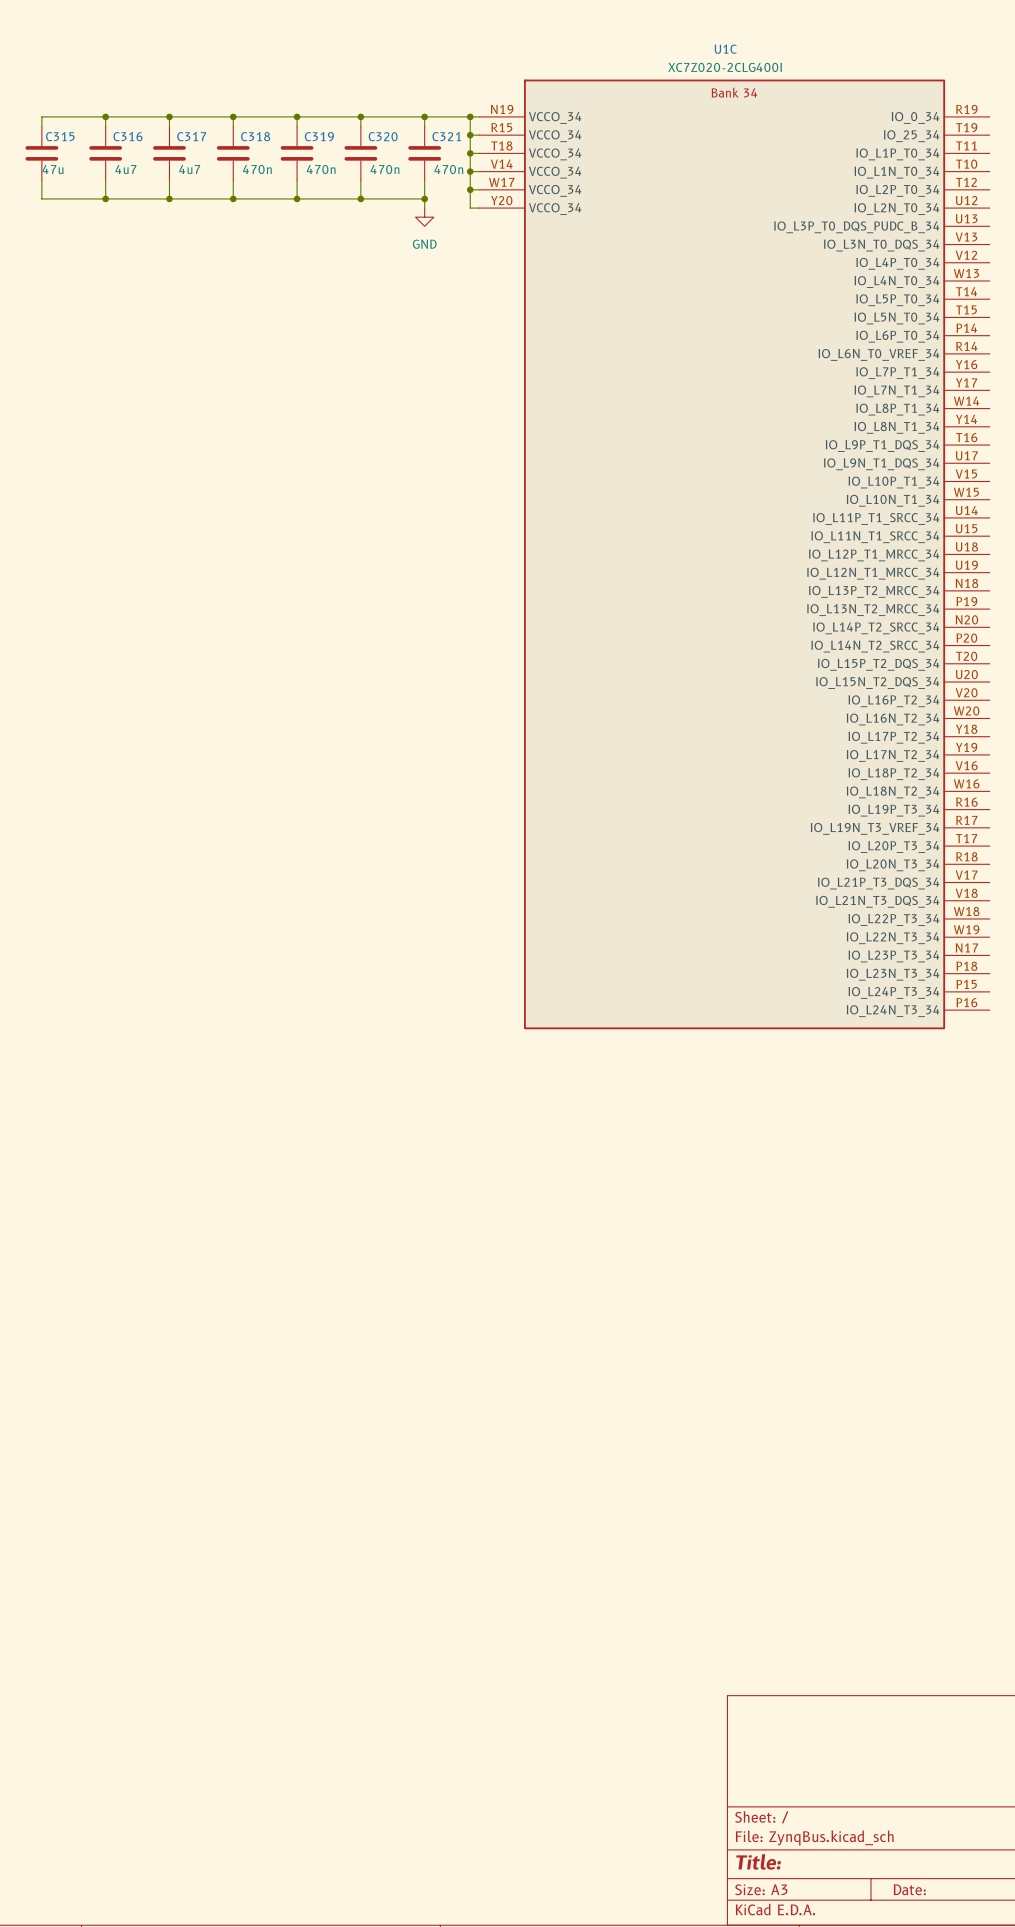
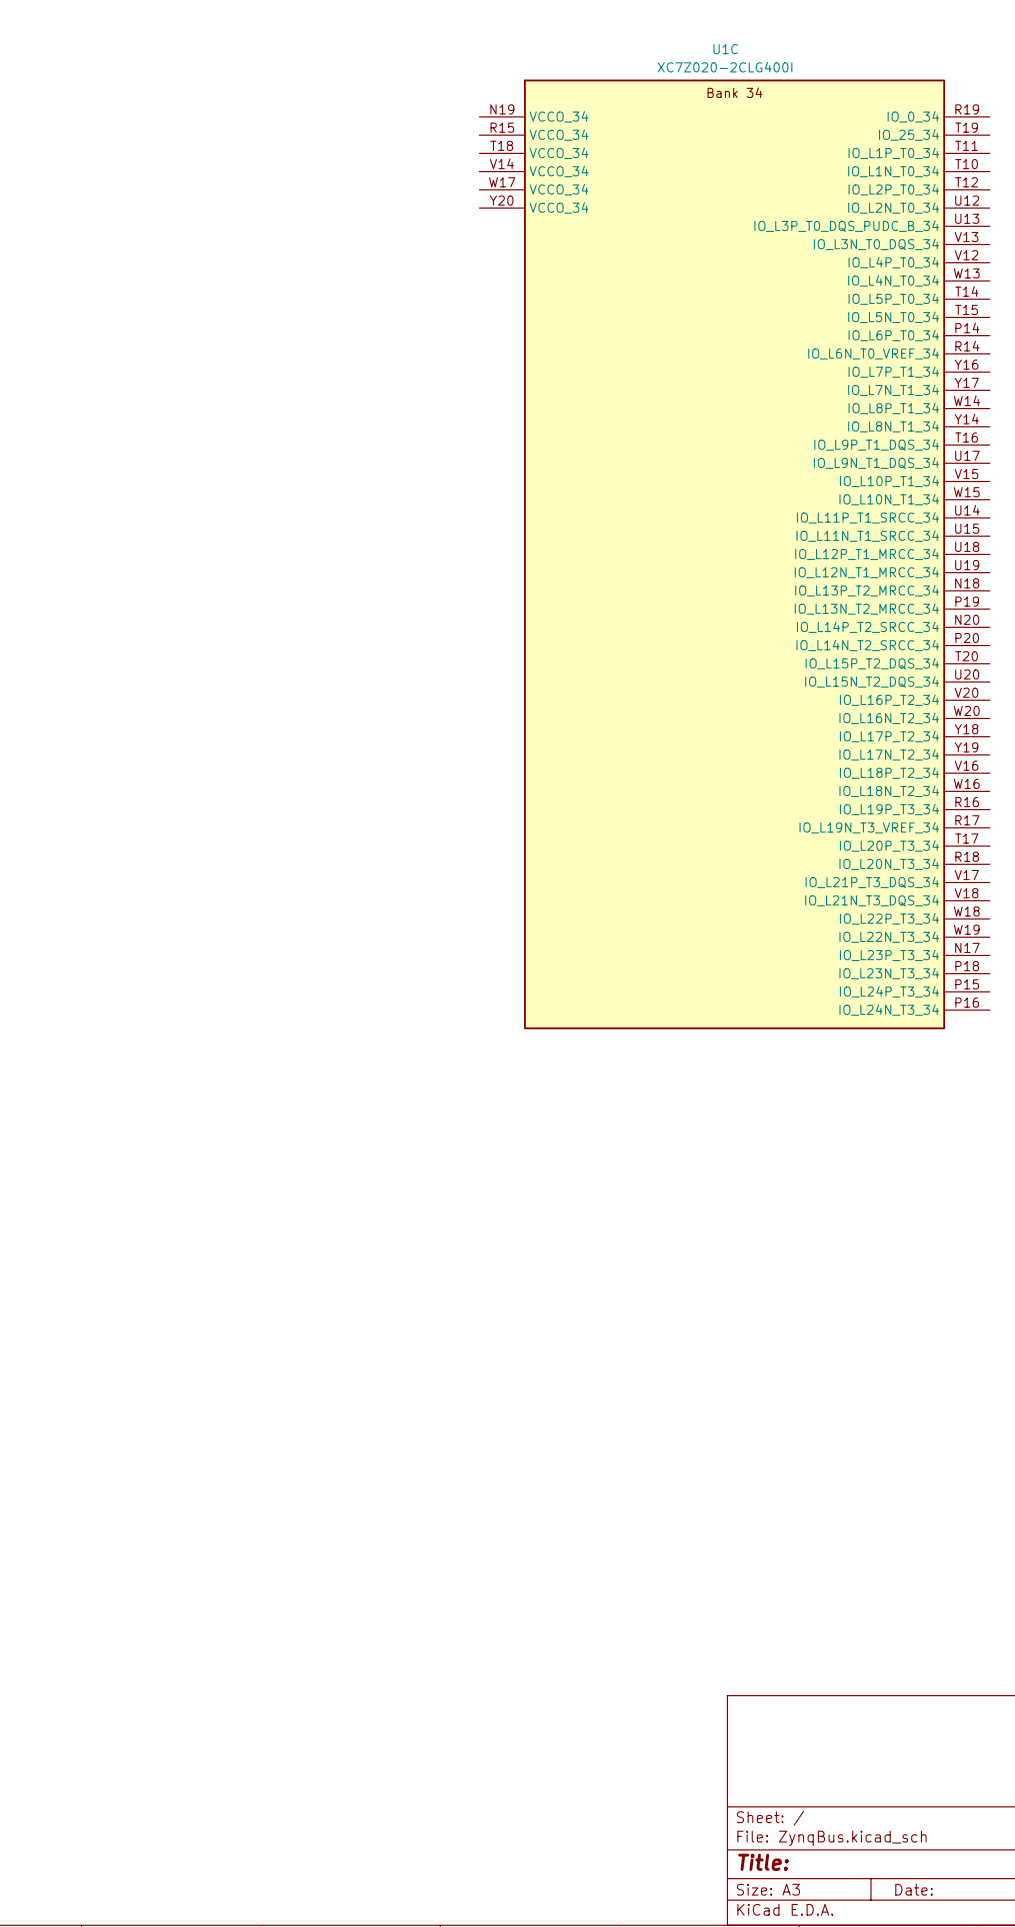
wire: (105, 116) (105, 126) -> none
junction: (105, 116) -> none
wire: (169, 116) (169, 126) -> none
junction: (169, 116) -> none
wire: (233, 116) (233, 126) -> none
junction: (233, 116) -> none
wire: (297, 116) (297, 126) -> none
junction: (297, 116) -> none
wire: (360, 116) (360, 126) -> none
junction: (360, 116) -> none
wire: (424, 116) (424, 126) -> none
junction: (424, 116) -> none
wire: (470, 116) (470, 208) (479, 208) -> none
junction: (470, 116) -> none
wire: (479, 116) (41, 116) (41, 126) -> none
wire: (470, 135) (479, 135) -> none
junction: (470, 135) -> none
C315: 47u (41, 153) -> none
C316: 4u7 (105, 153) -> none
C317: 4u7 (169, 153) -> none
C318: 470n (233, 153) -> none
C319: 470n (297, 153) -> none
C320: 470n (360, 153) -> none
C321: 470n (424, 153) -> none
wire: (470, 153) (479, 153) -> none
junction: (470, 153) -> none
wire: (470, 171) (479, 171) -> none
junction: (470, 171) -> none
wire: (41, 180) (41, 198) (424, 198) -> none
wire: (105, 180) (105, 198) -> none
wire: (169, 180) (169, 198) -> none
wire: (233, 180) (233, 198) -> none
wire: (297, 180) (297, 198) -> none
wire: (360, 180) (360, 198) -> none
wire: (424, 180) (424, 208) -> none
wire: (470, 189) (479, 189) -> none
junction: (470, 189) -> none
junction: (105, 198) -> none
junction: (169, 198) -> none
junction: (233, 198) -> none
junction: (297, 198) -> none
junction: (360, 198) -> none
junction: (424, 198) -> none
power symbol: GND (424, 217) -> none

